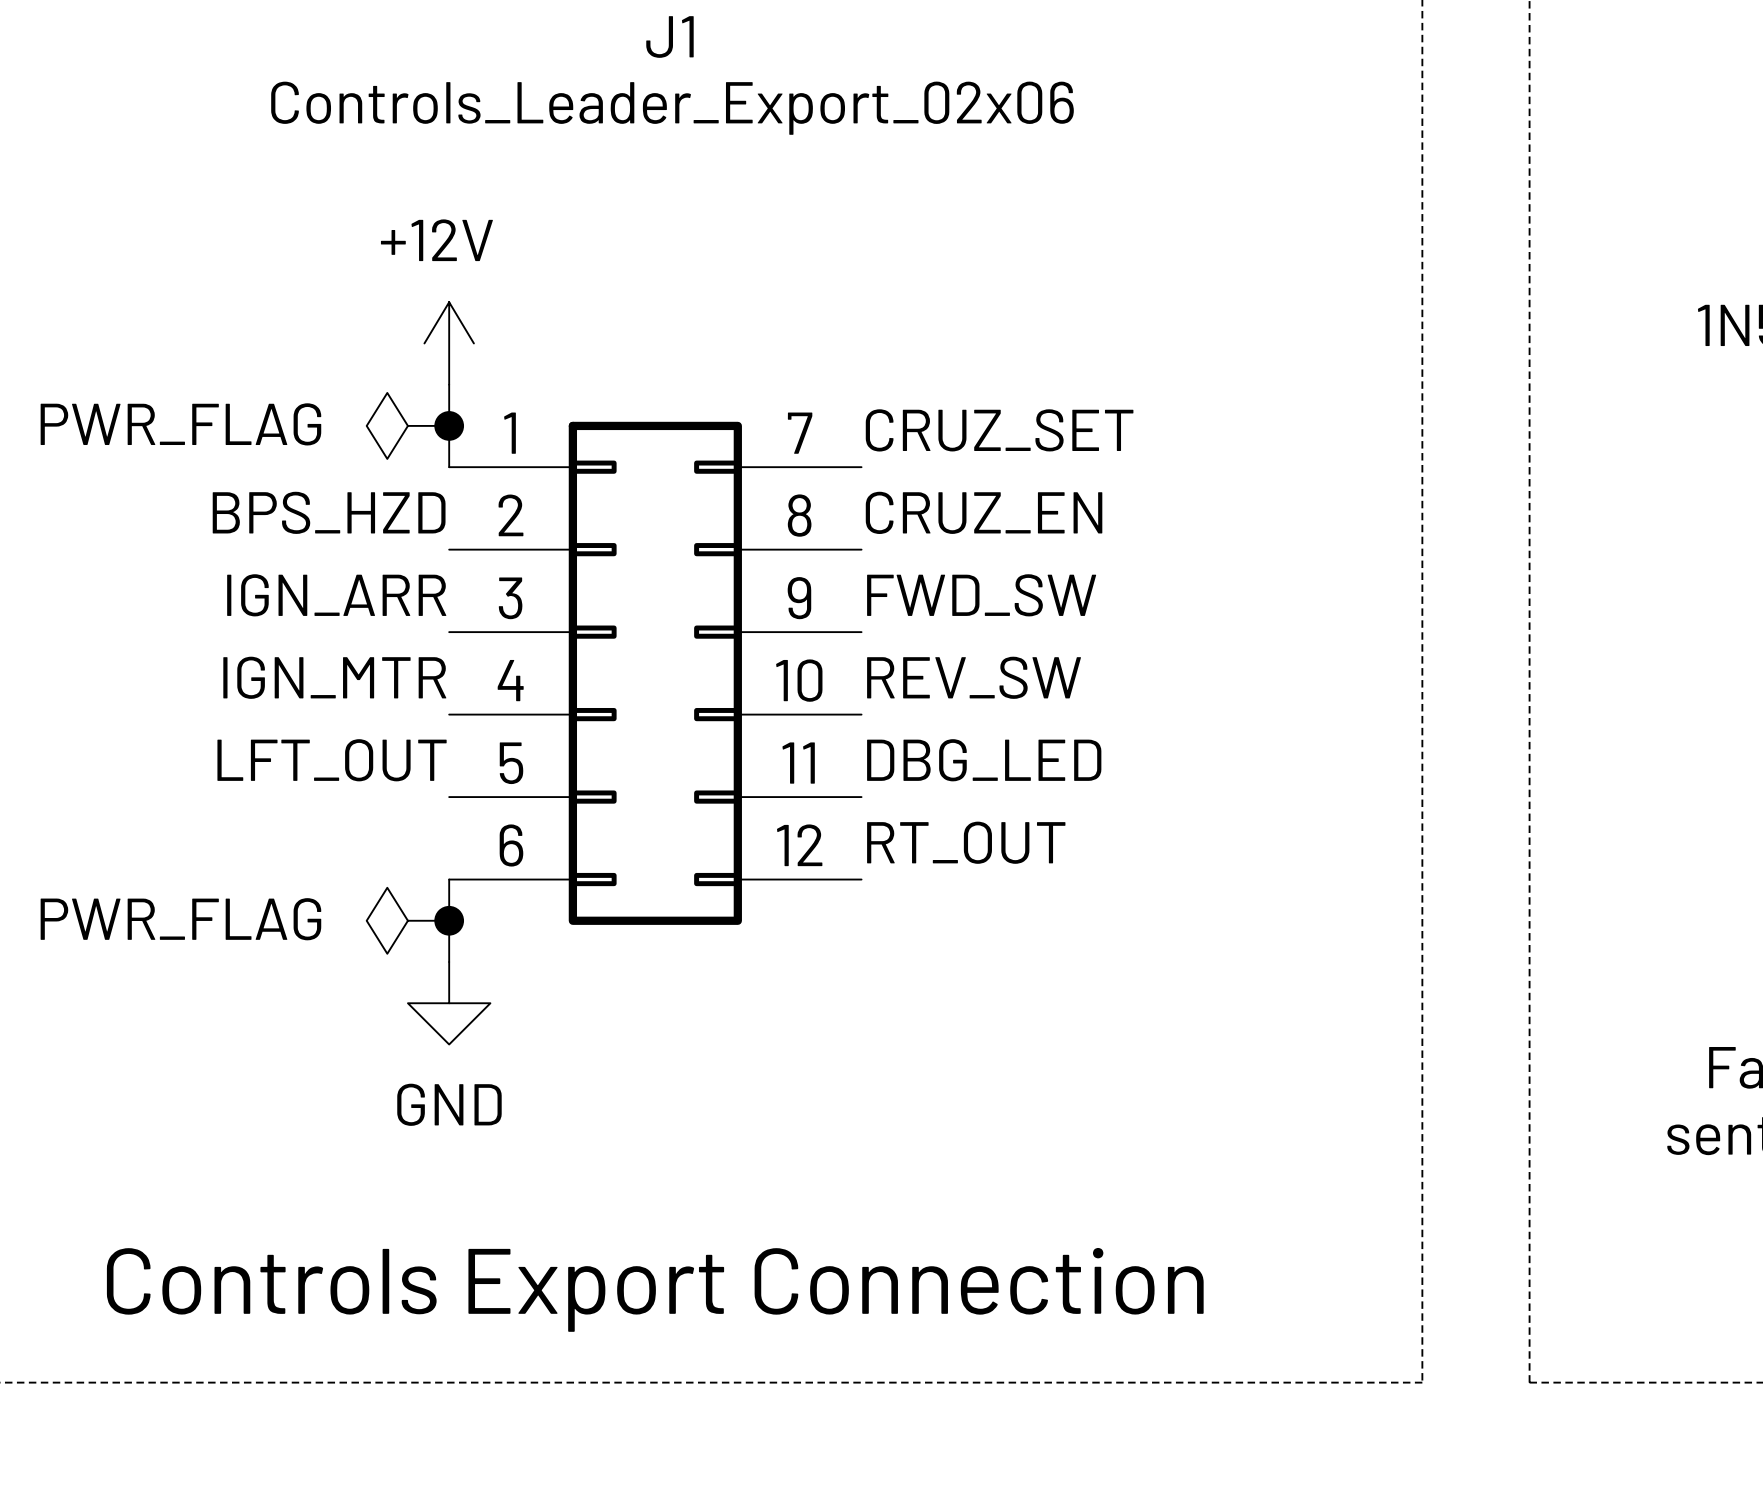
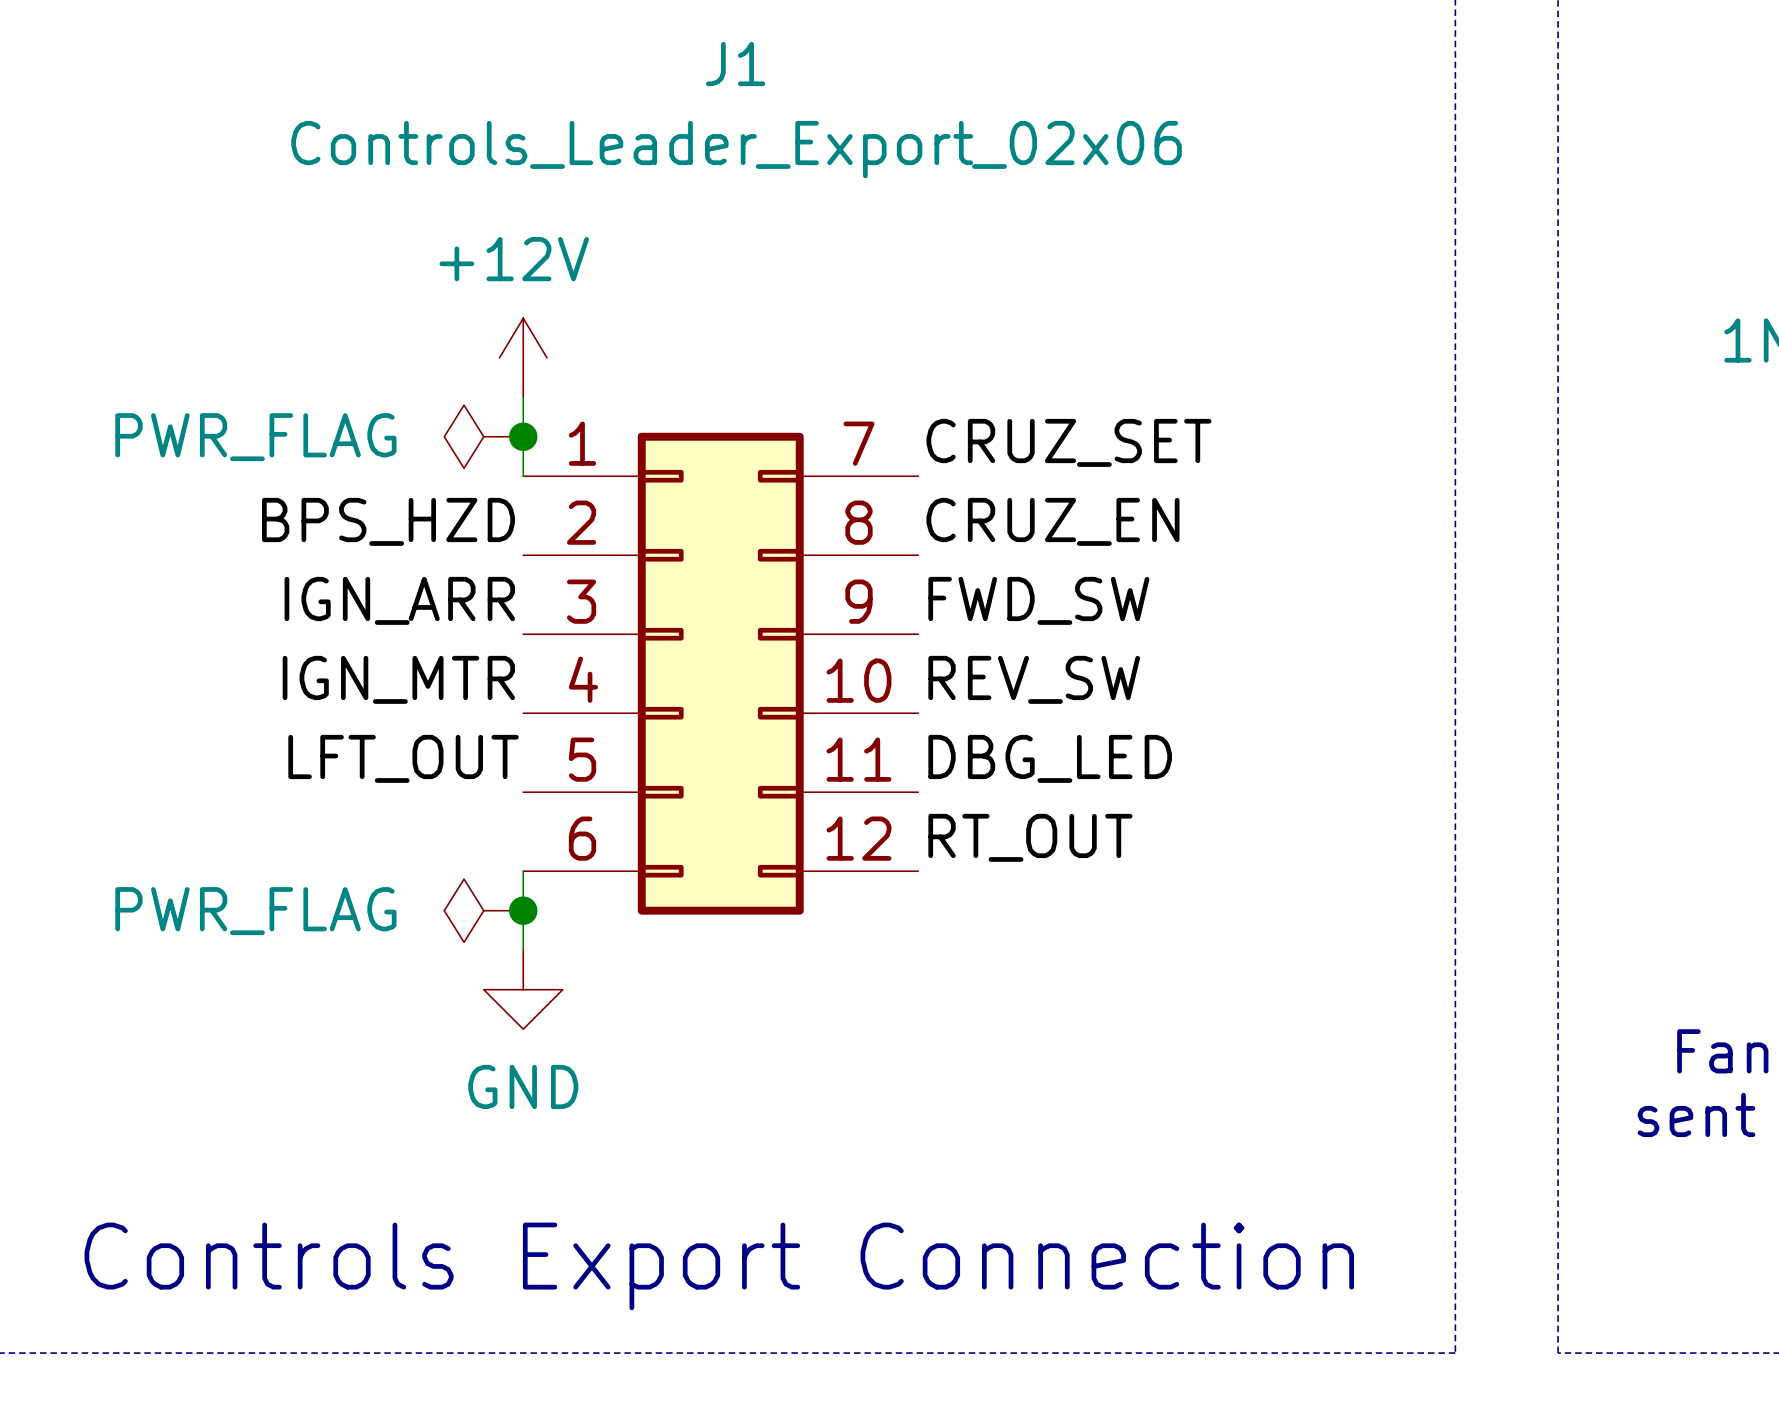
J1 value position: Controls_Leader_Export_02x06 (672, 108) -> Controls_Leader_Export_02x06 (736, 149)

